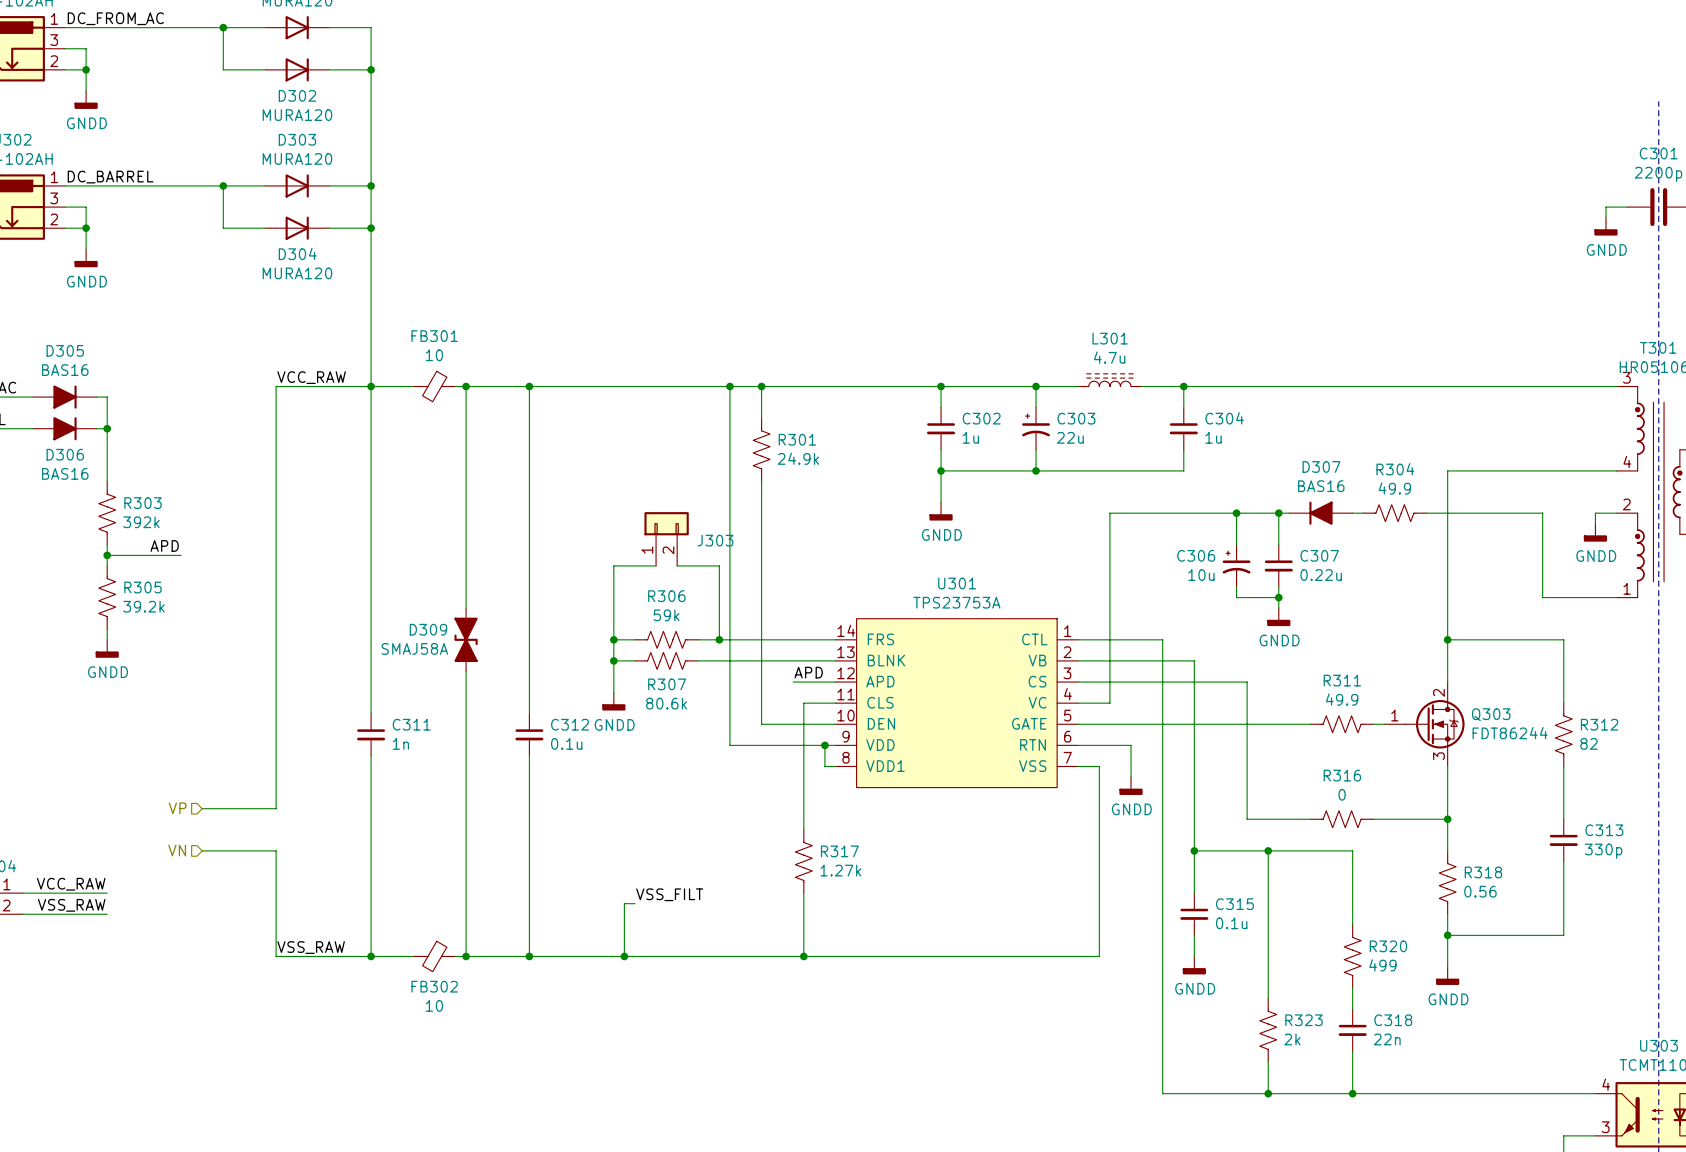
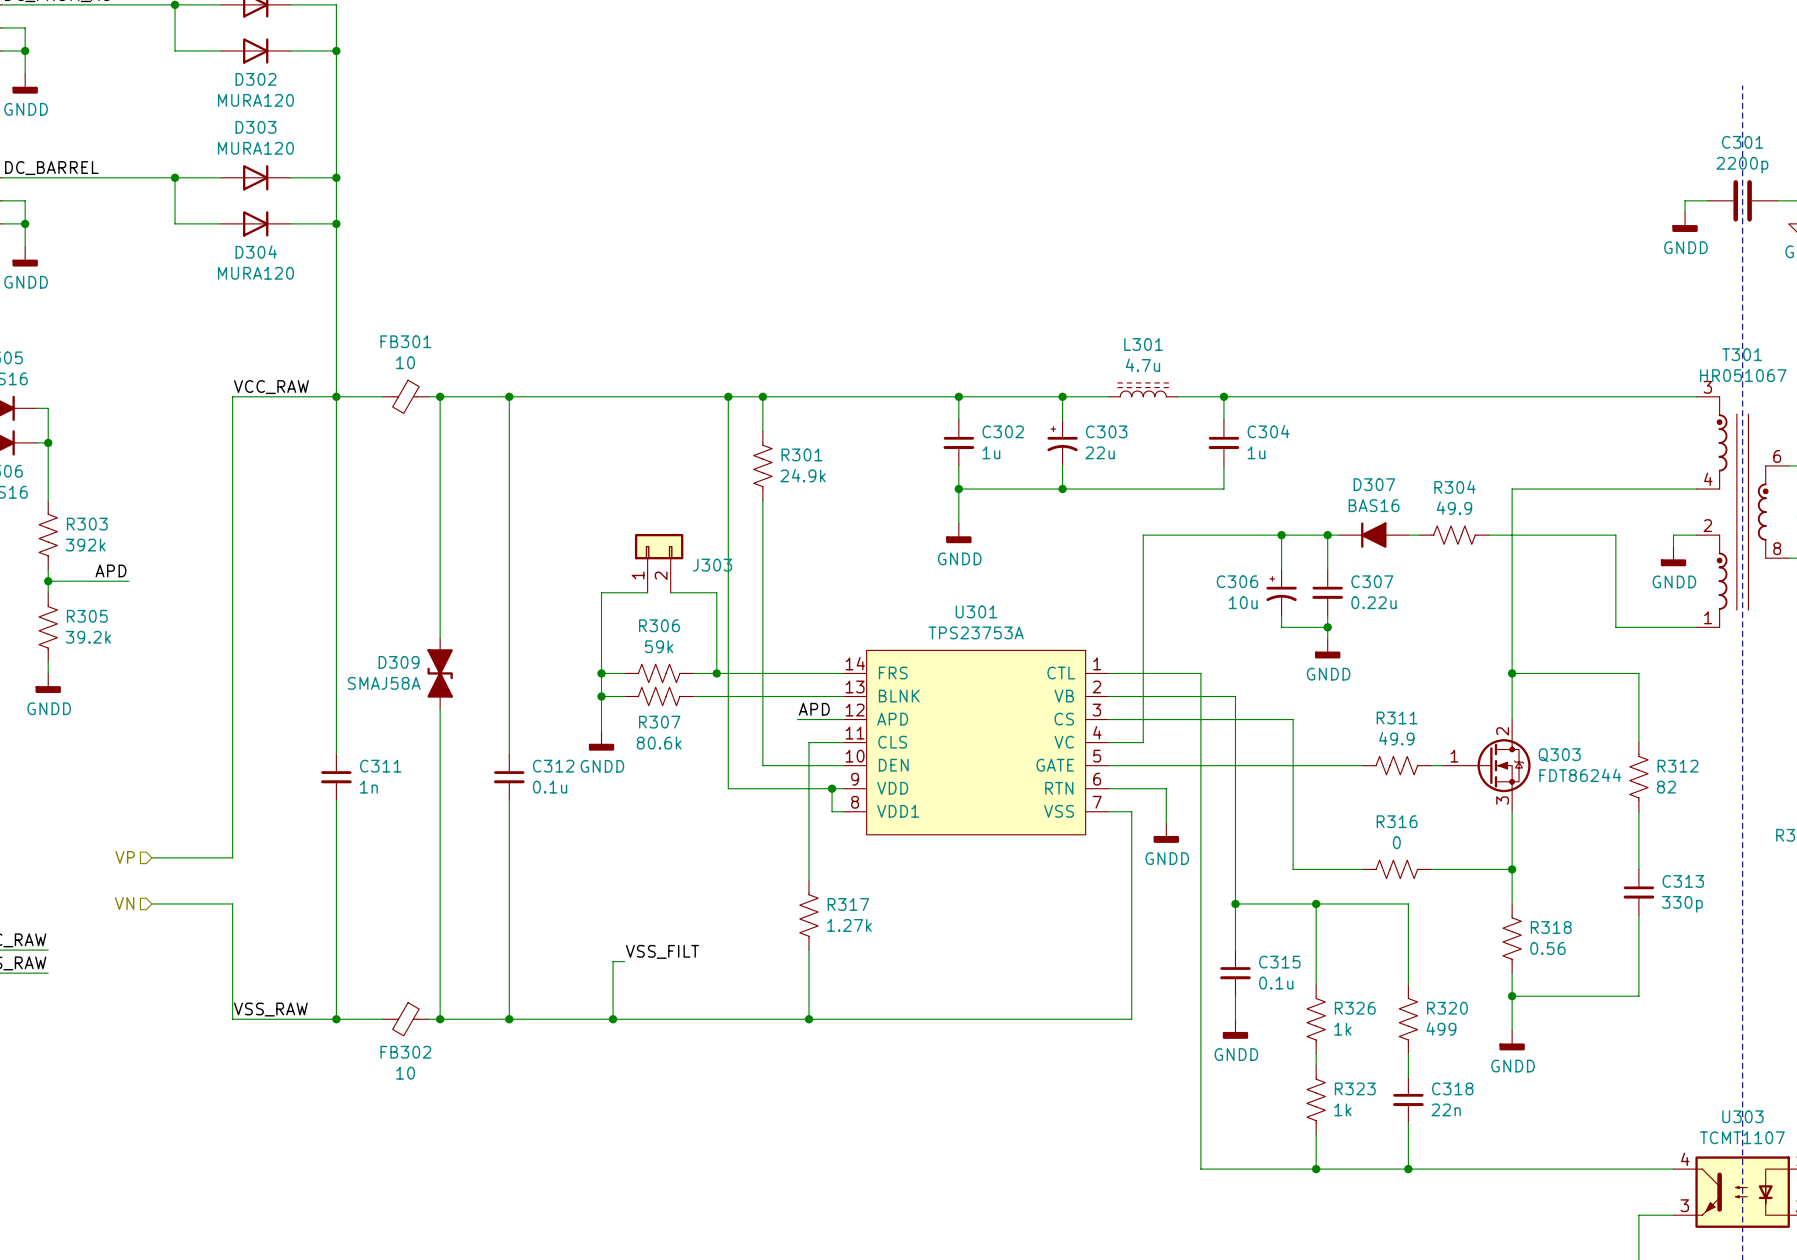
R326: none -> 1k (1316, 1019)
R323 value: 2k (1292, 1039) -> 1k (1342, 1109)

